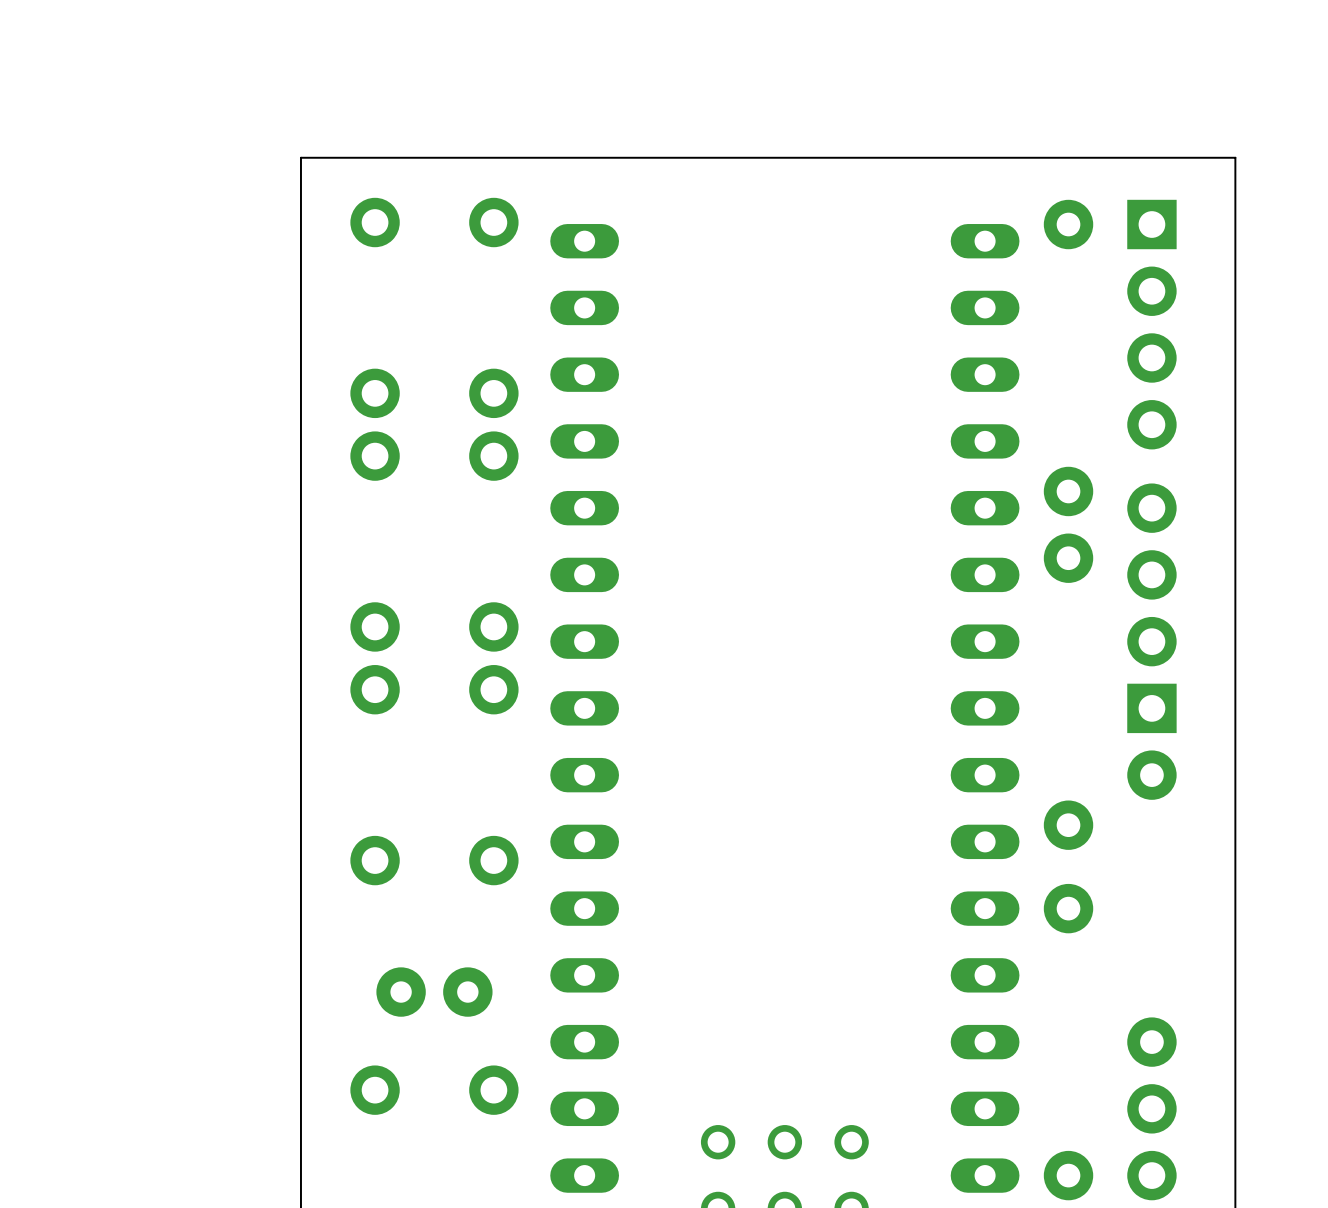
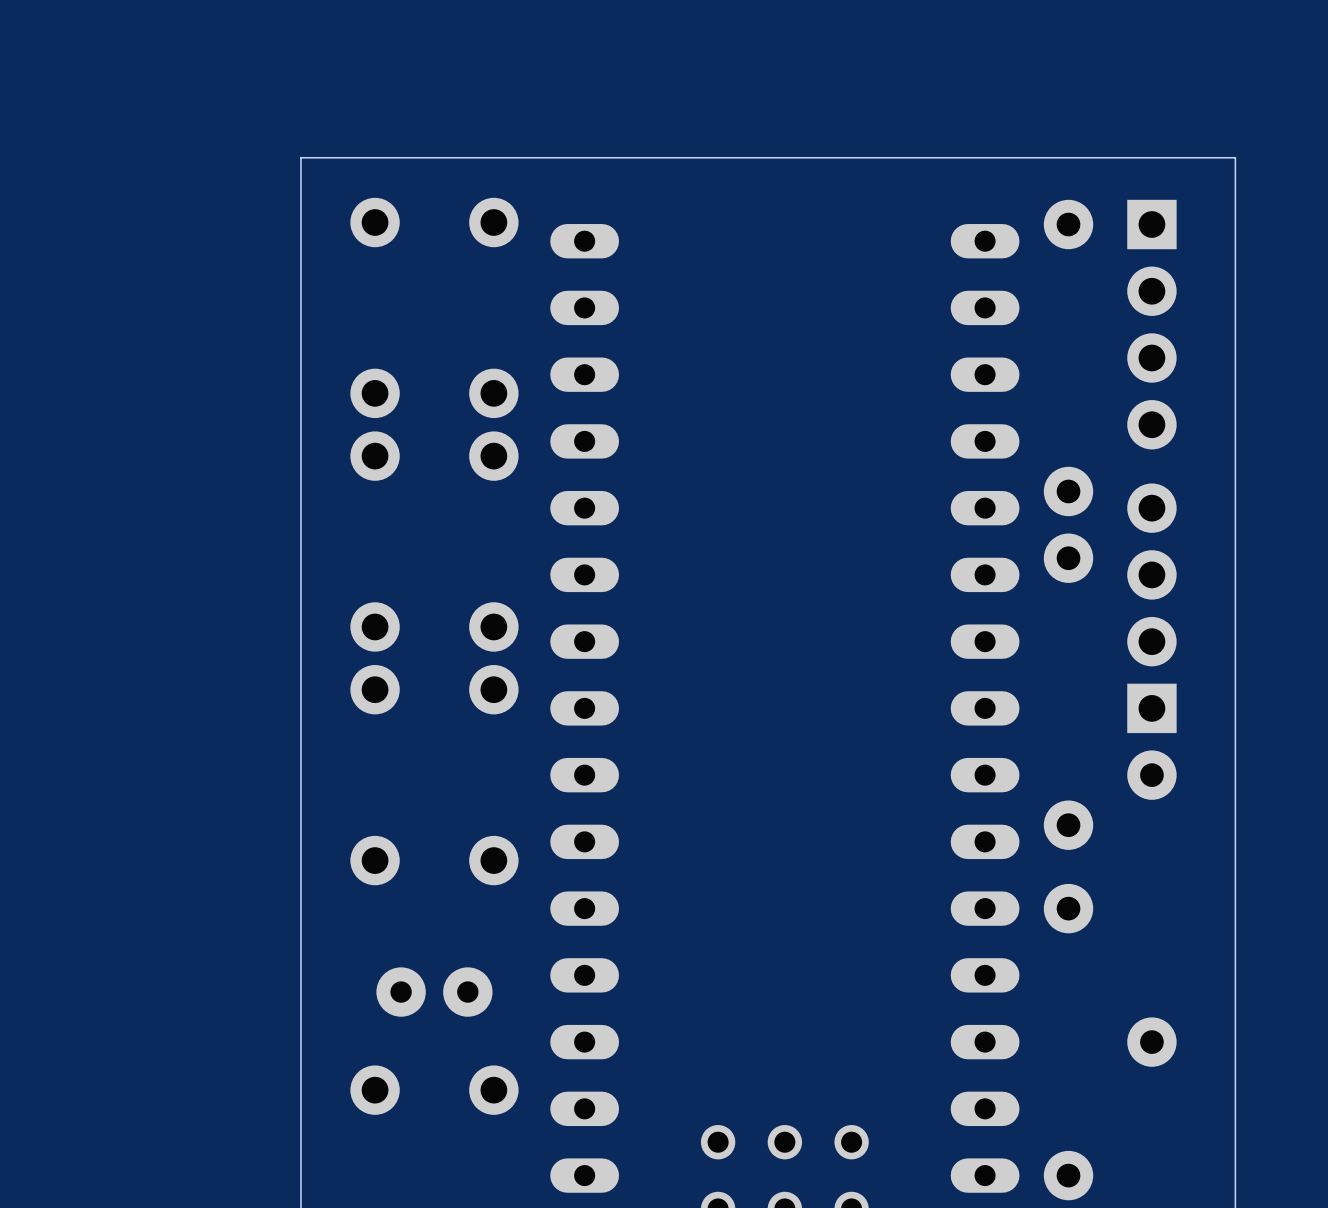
part: (1151, 1142) -> none

